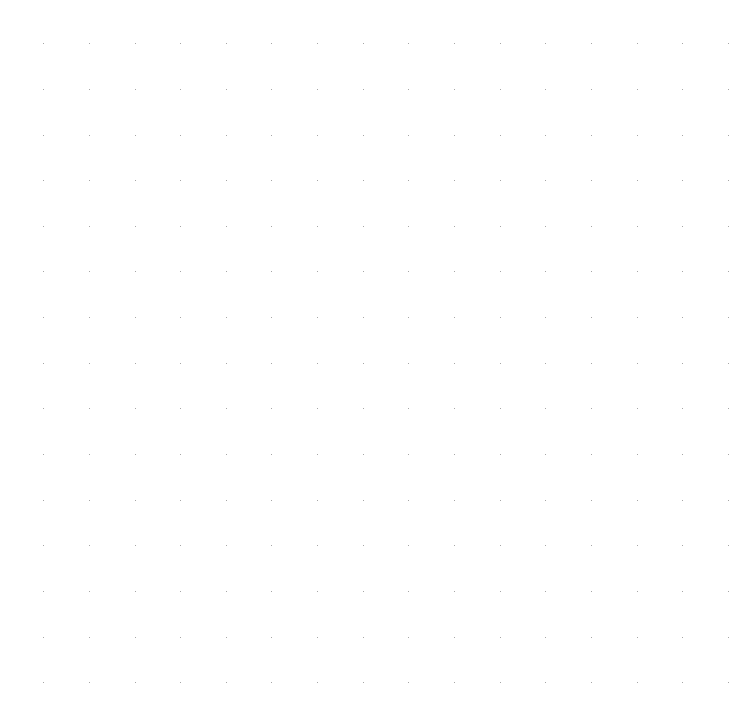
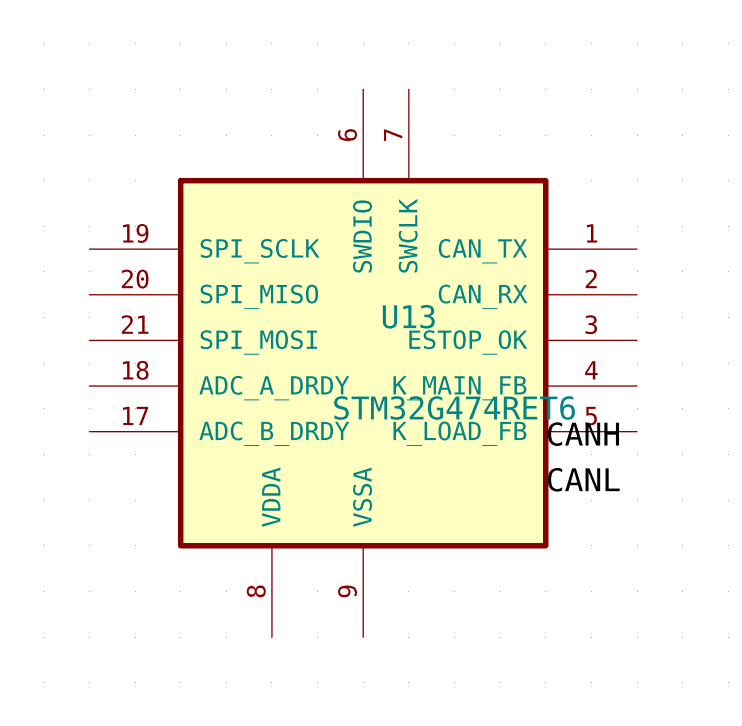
U13: none -> STM32G474RET6 (363, 363)
label: none -> CANH (583, 434)
label: none -> CANL (583, 479)

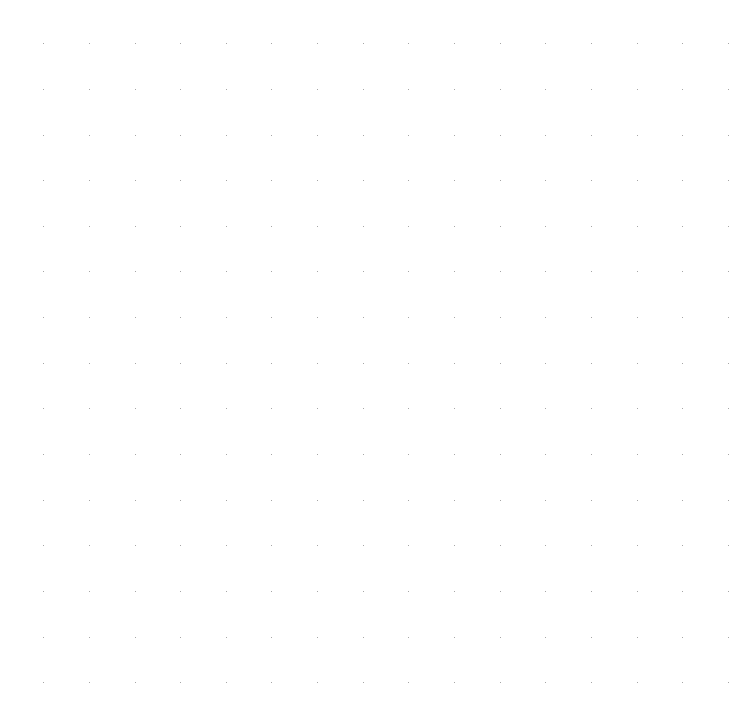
U13: STM32G474RET6 (363, 363) -> none
label: CANH (583, 434) -> none
label: CANL (583, 479) -> none

